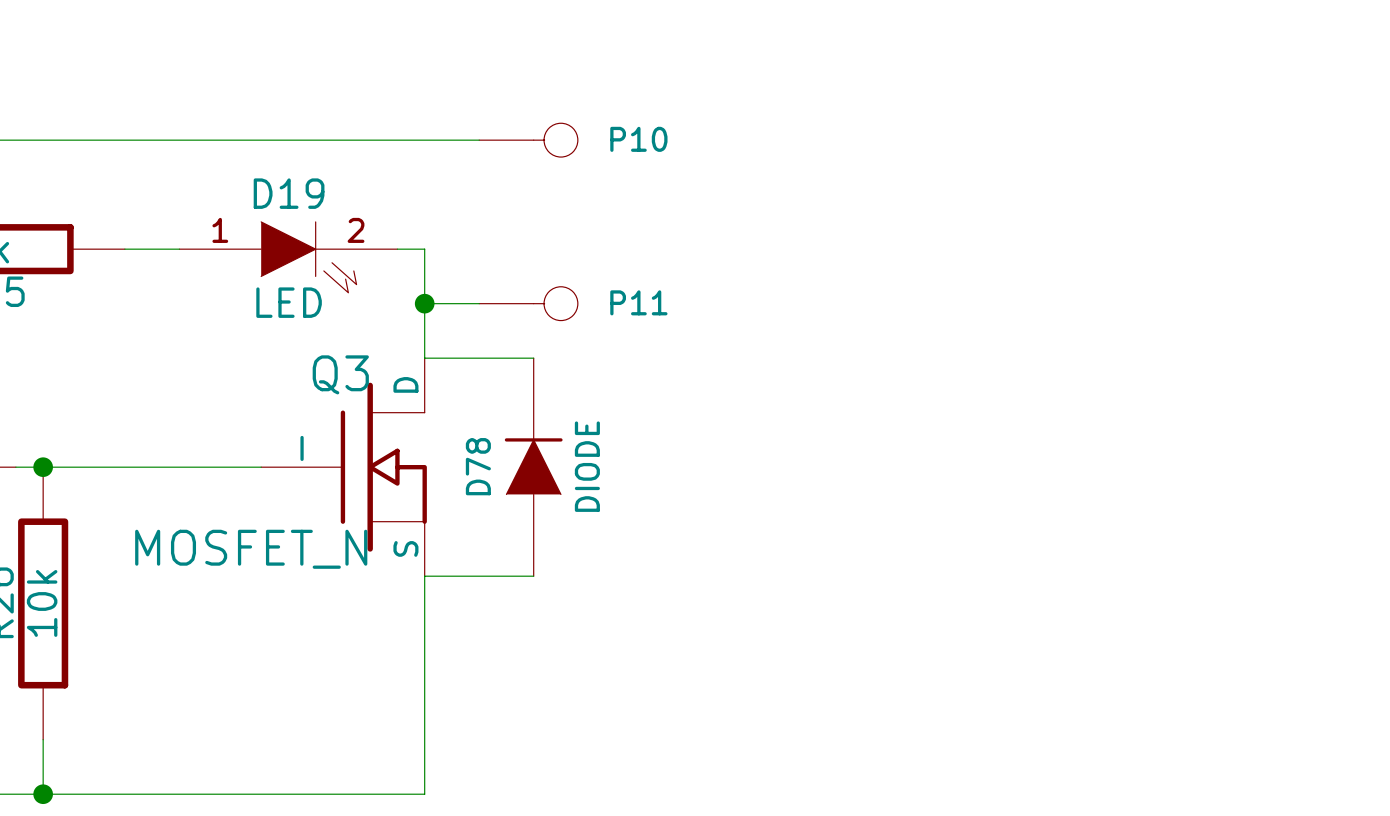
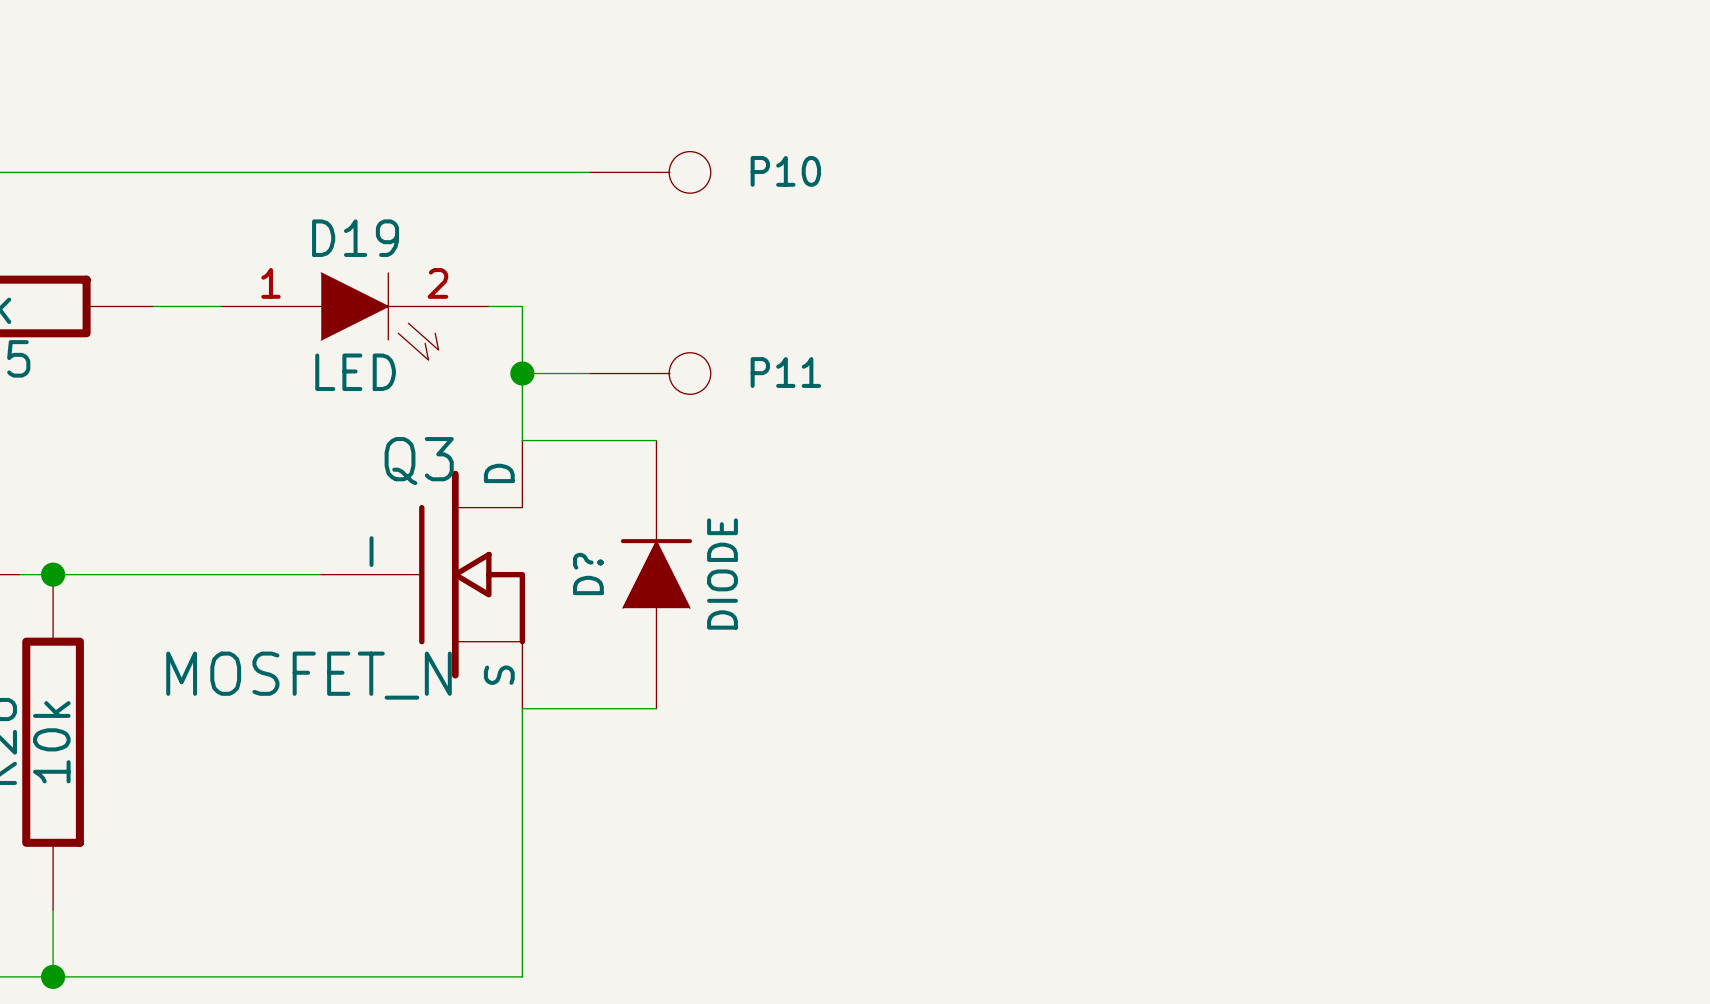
D78 name: D78 (478, 466) -> D? (588, 574)

